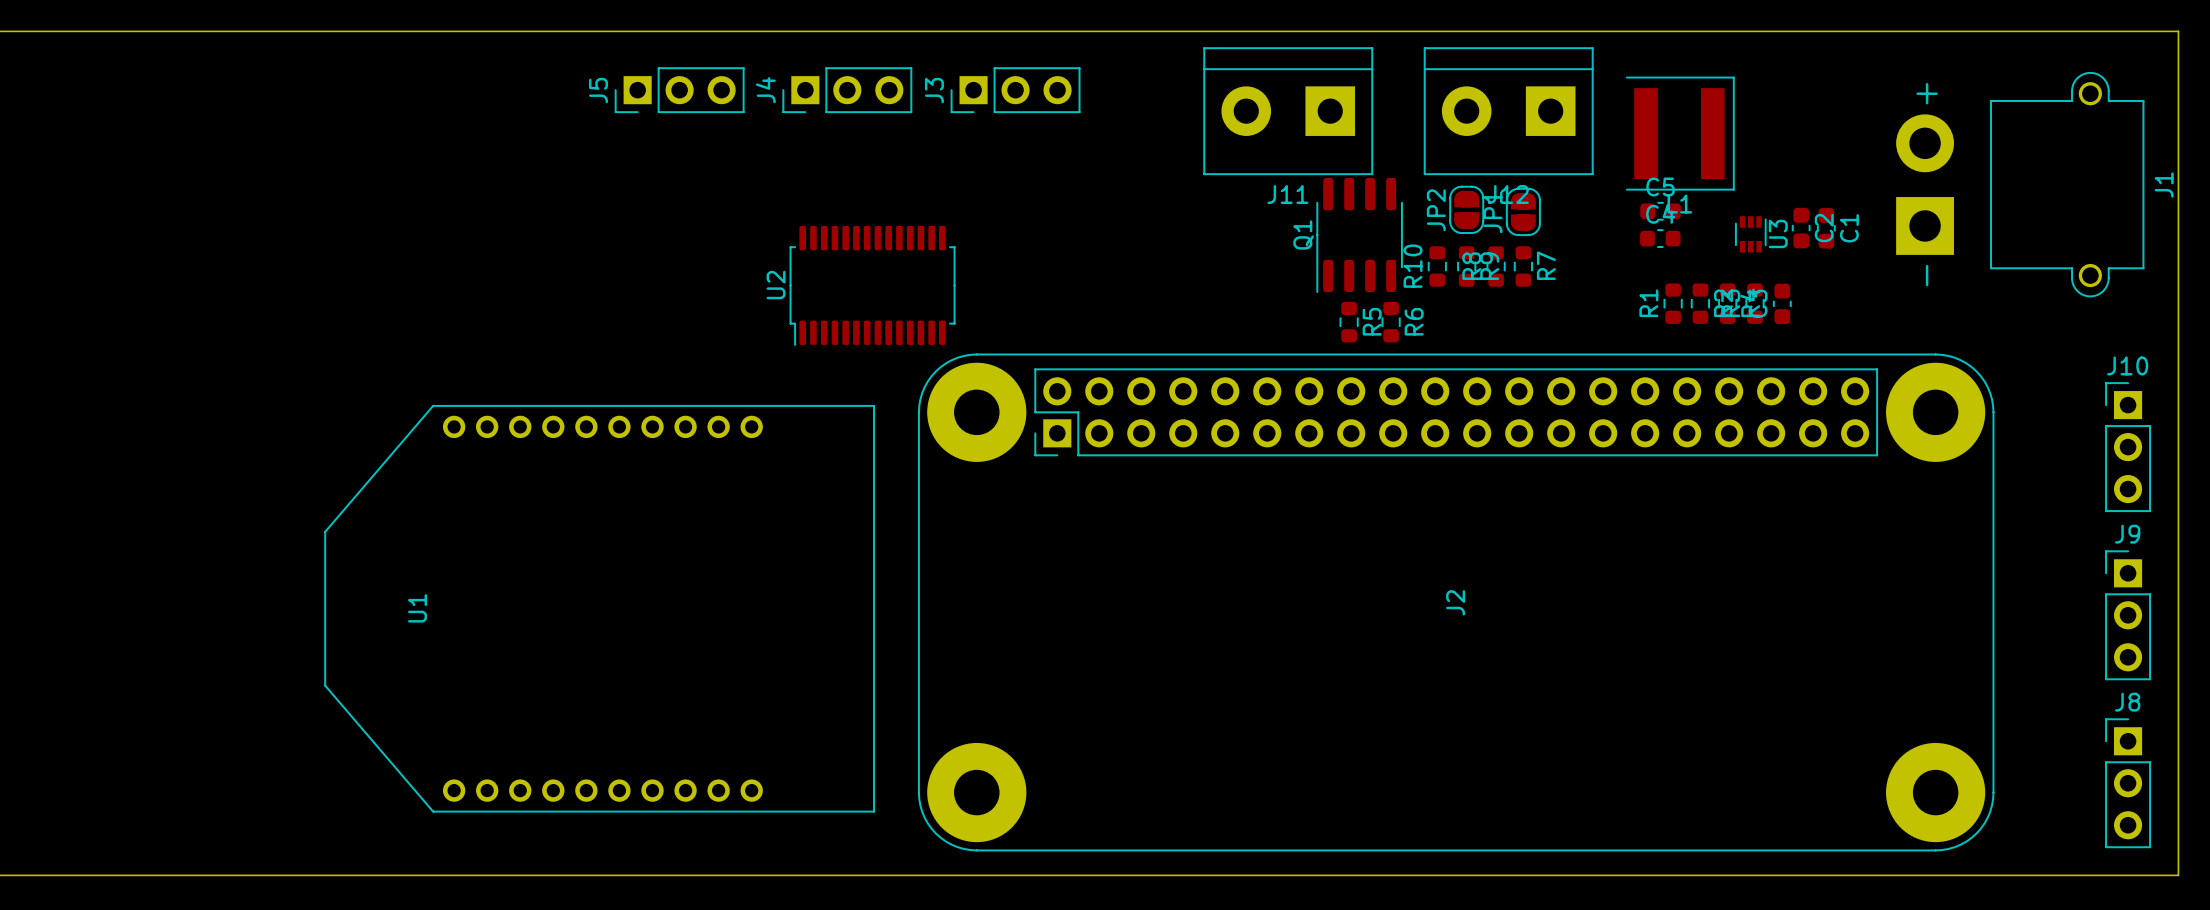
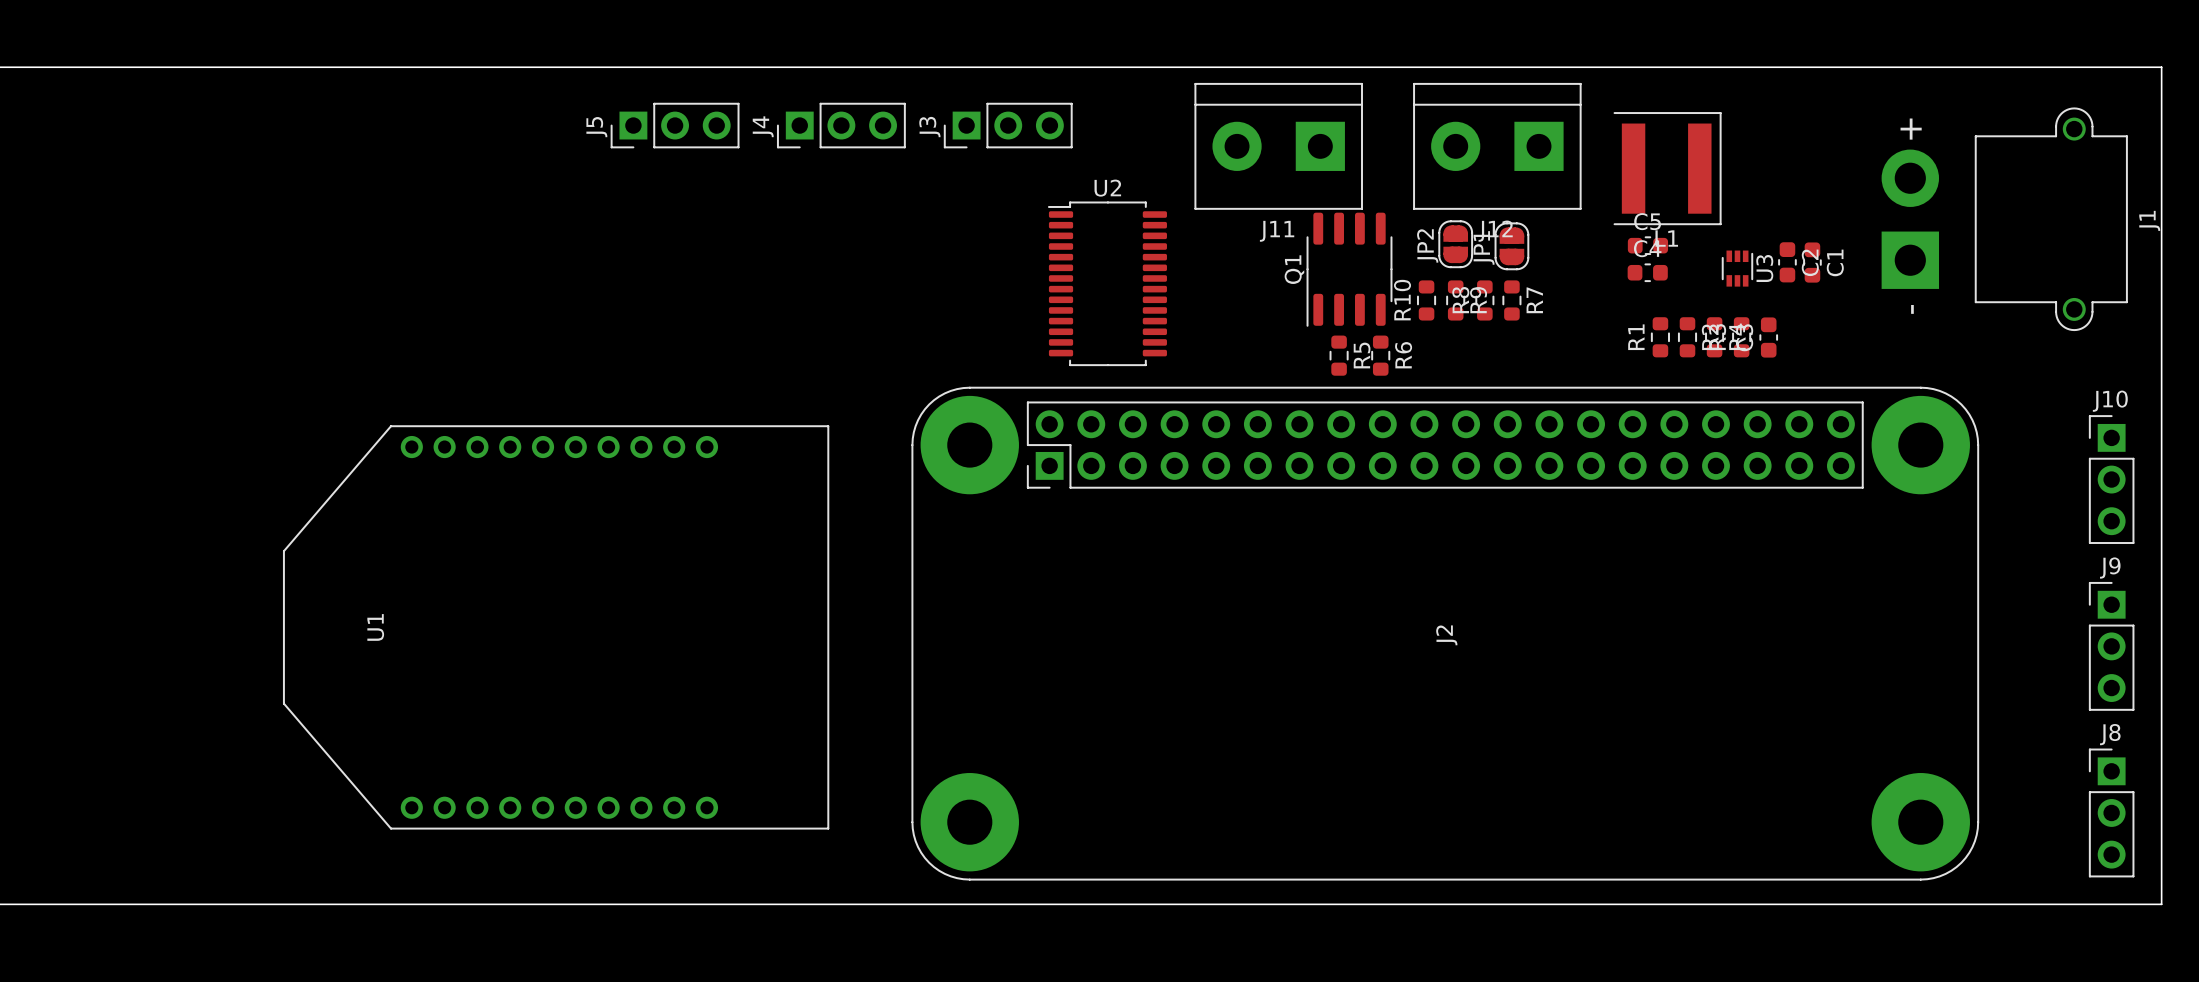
U2 rotation: 0° (872, 285) -> 90° clockwise (1107, 283)
U2 position: (872, 285) -> (1107, 283)
U1 position: (599, 608) -> (556, 627)

